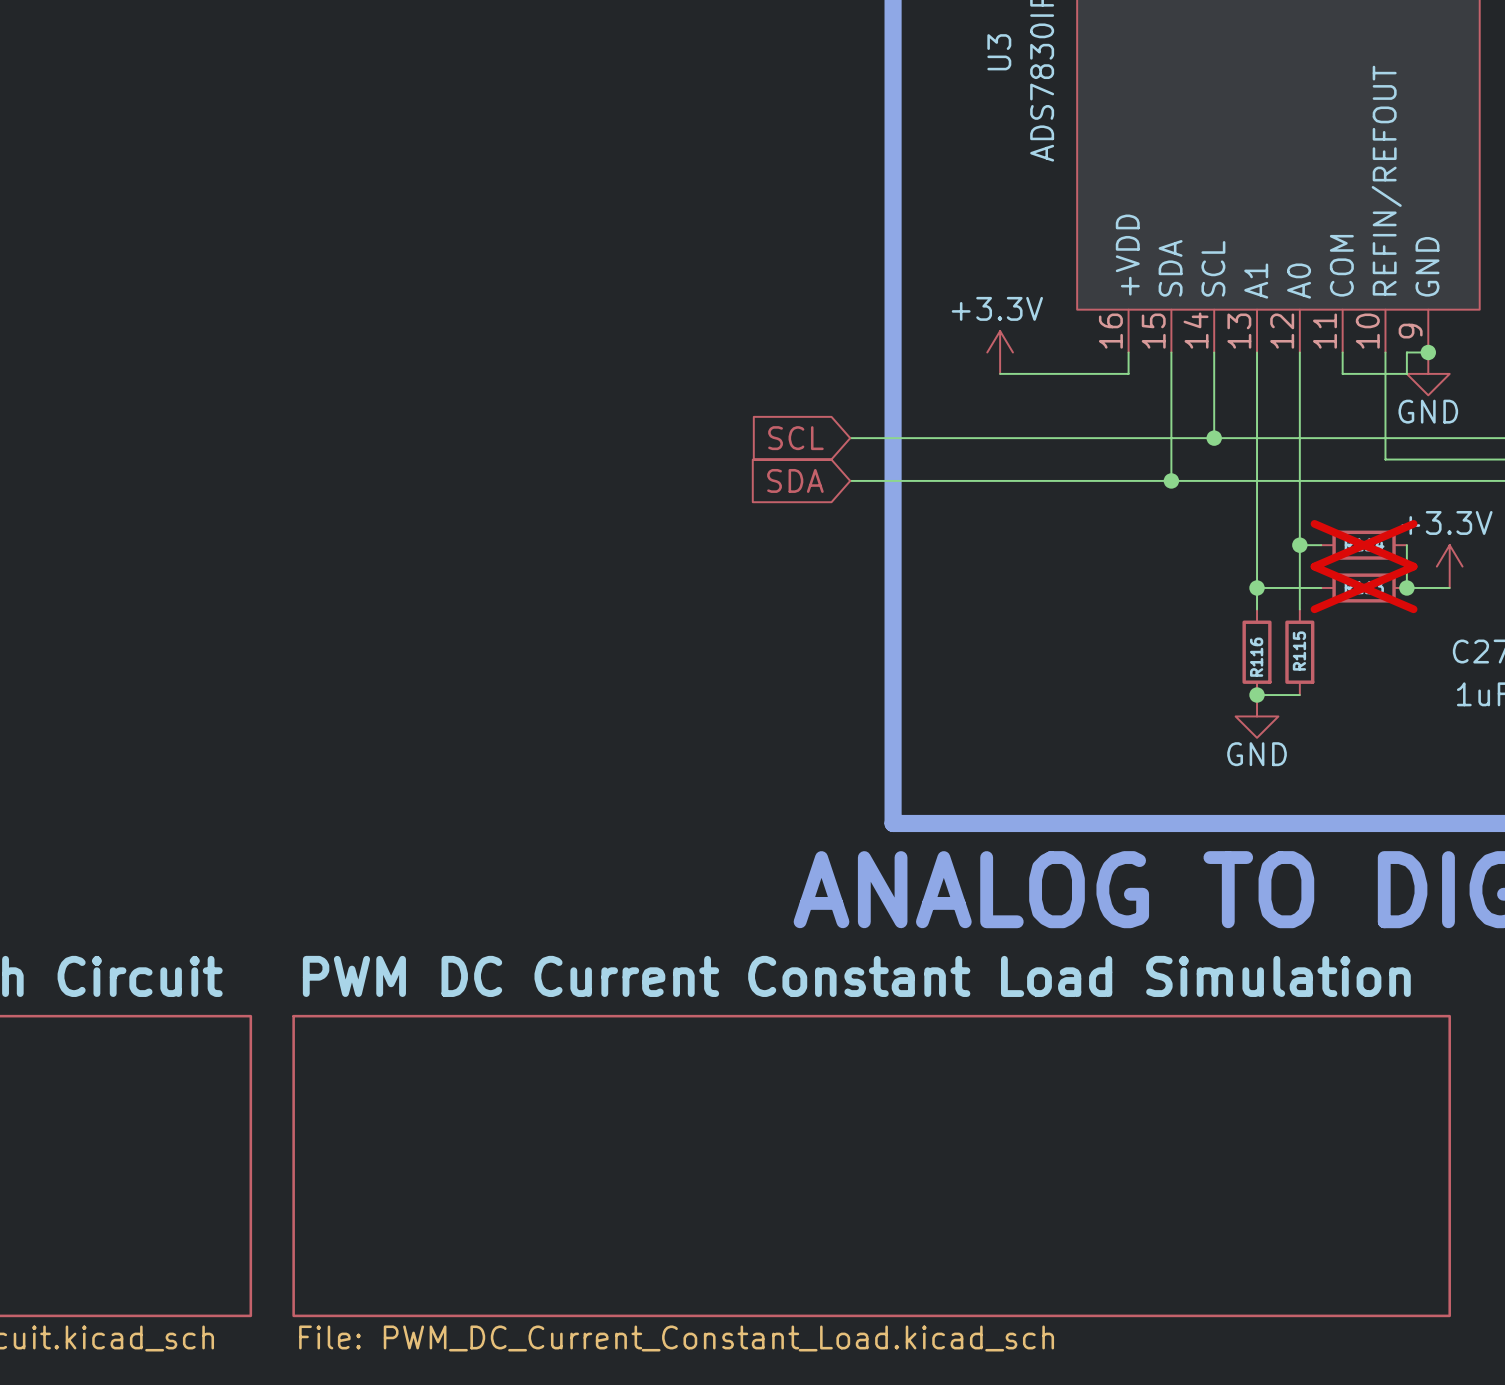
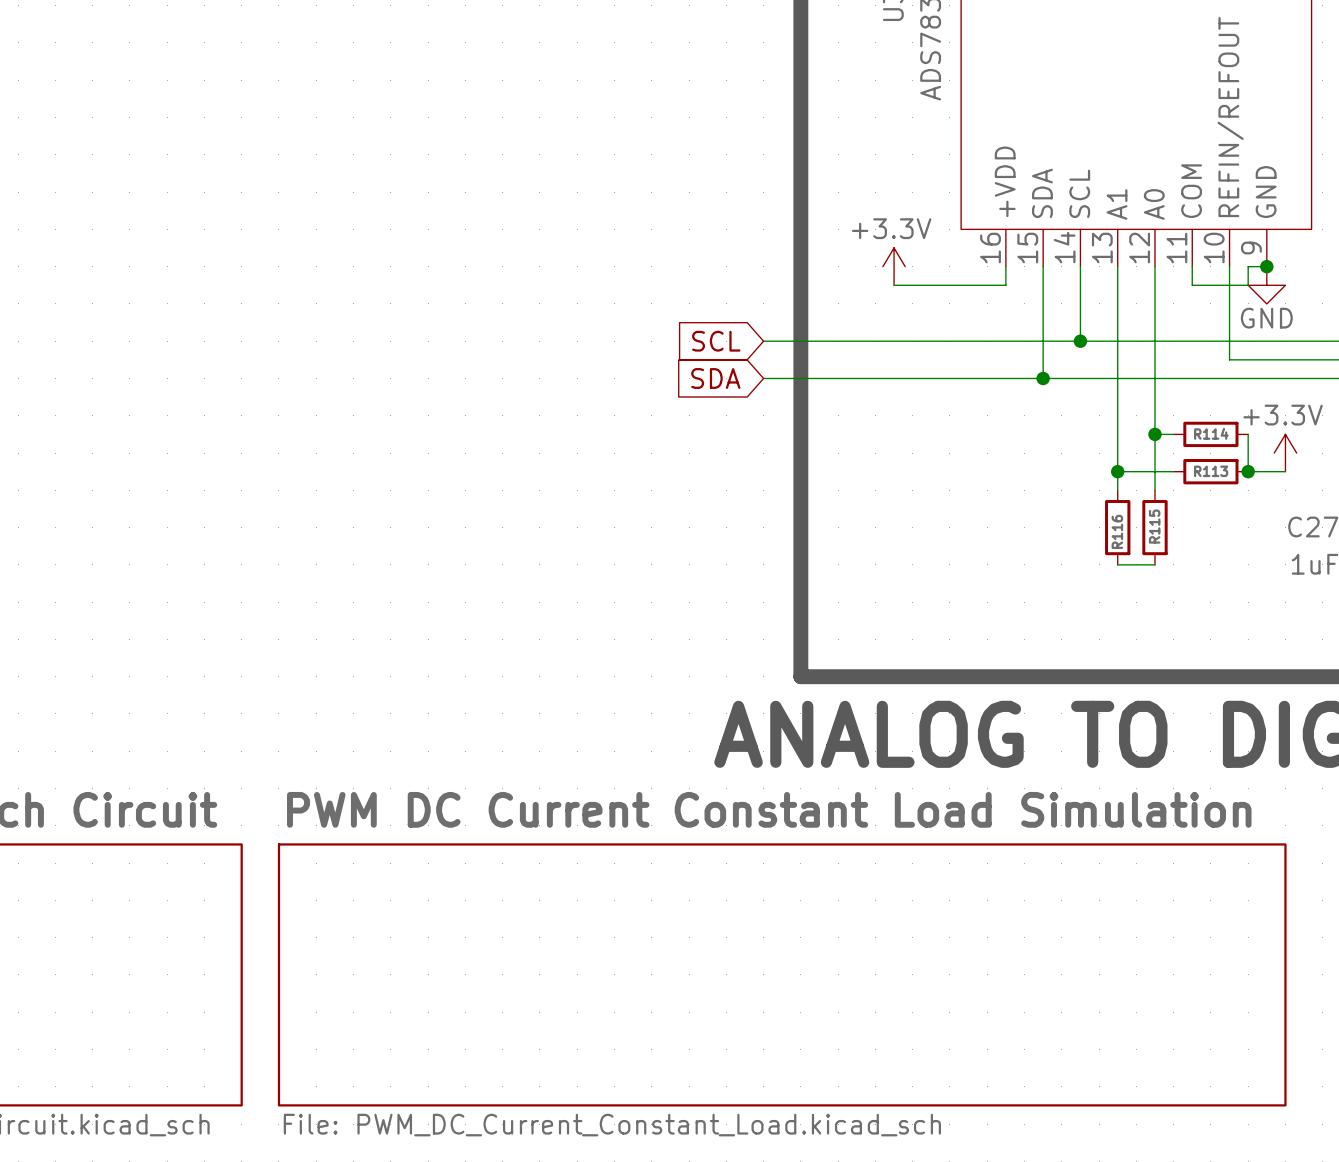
R114 do-not-place cross: (1364, 545) -> none
R113 do-not-place cross: (1364, 587) -> none
junction: (1257, 695) -> none
power symbol: GND (1257, 716) -> none

